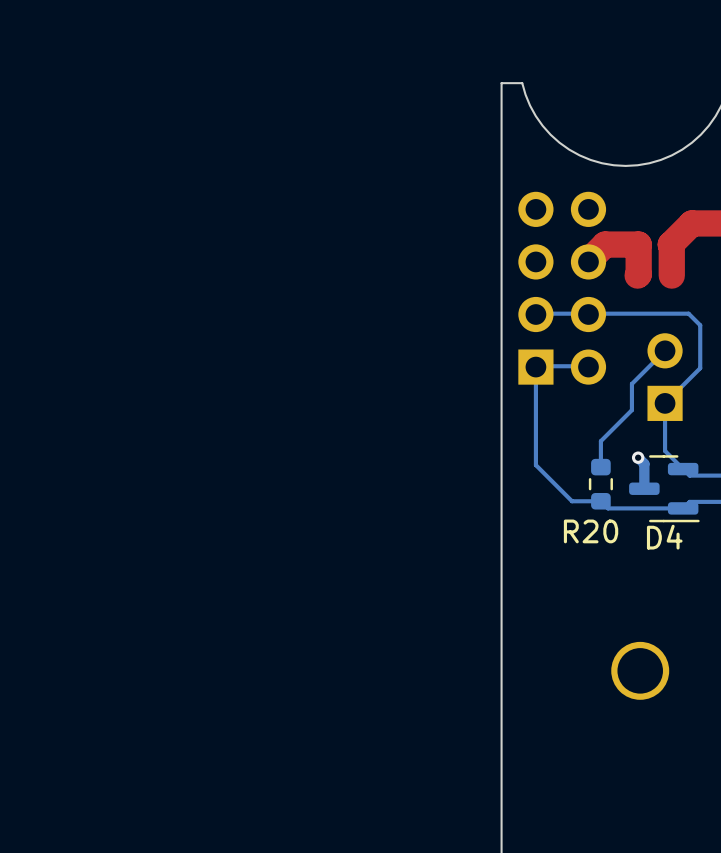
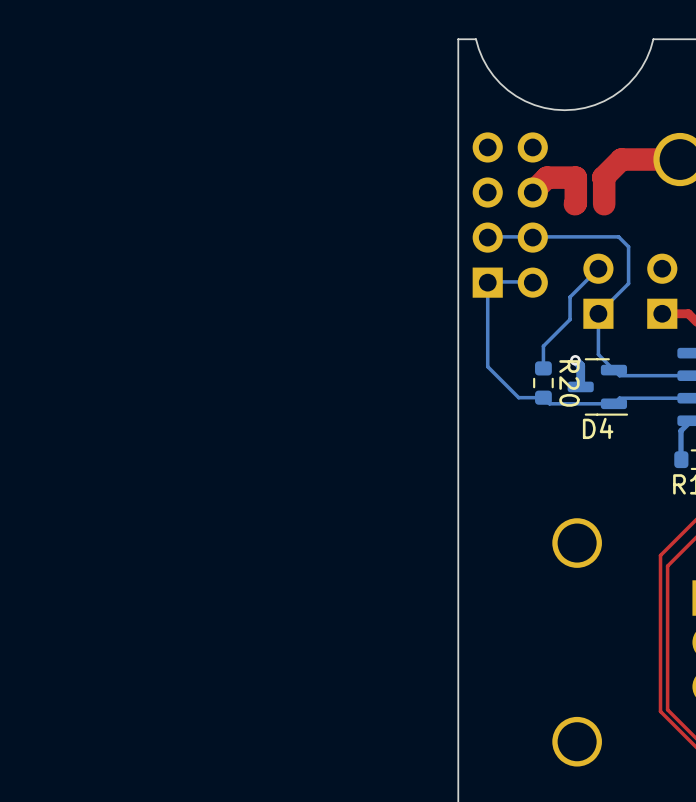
R20 name rotation: 0° (591, 531) -> 90° clockwise (569, 383)

